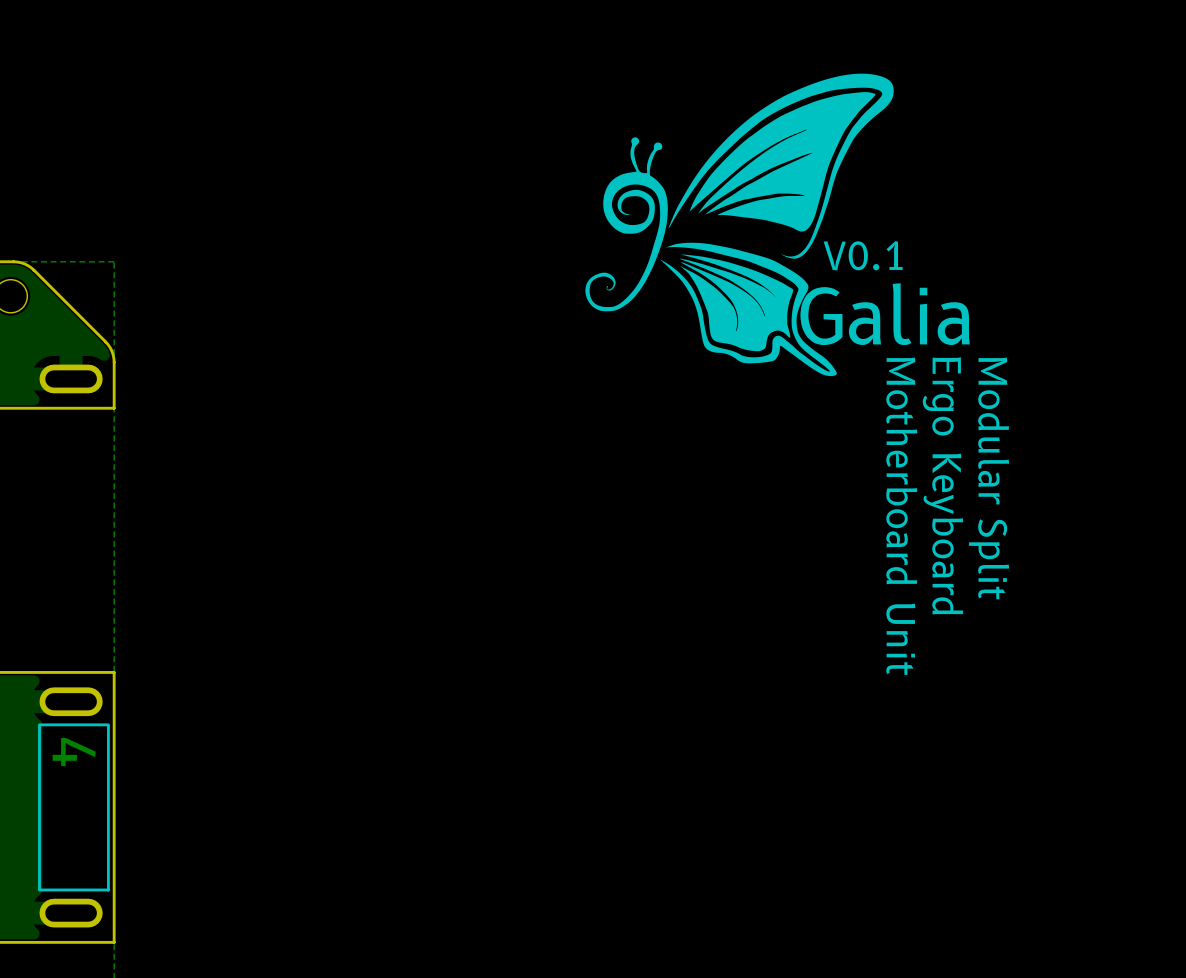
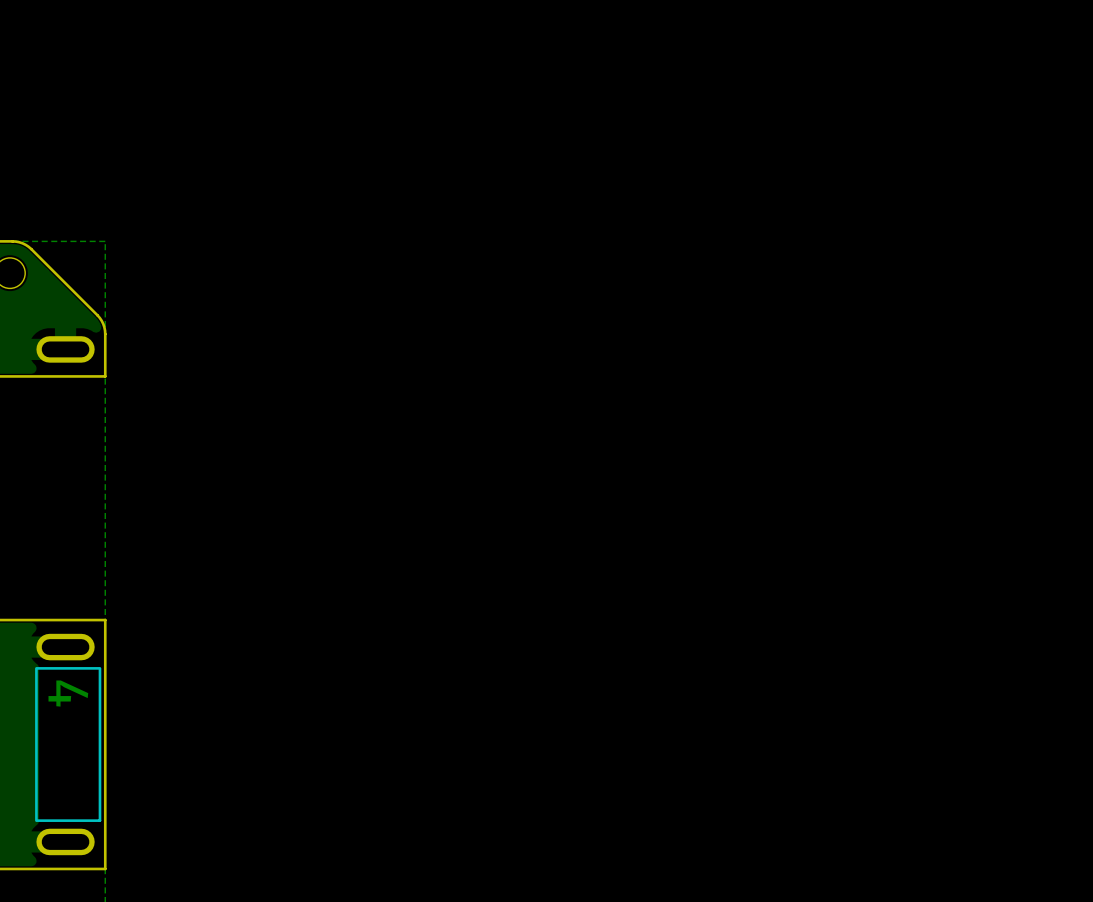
drawing: [585, 73, 894, 377] -> none
text: V0.1 (863, 255) -> none
text: Galia (885, 314) -> none
text: Modular Split (989, 478) -> none
text: Ergo Keyboard (942, 485) -> none
text: Motherboard Unit (901, 516) -> none

